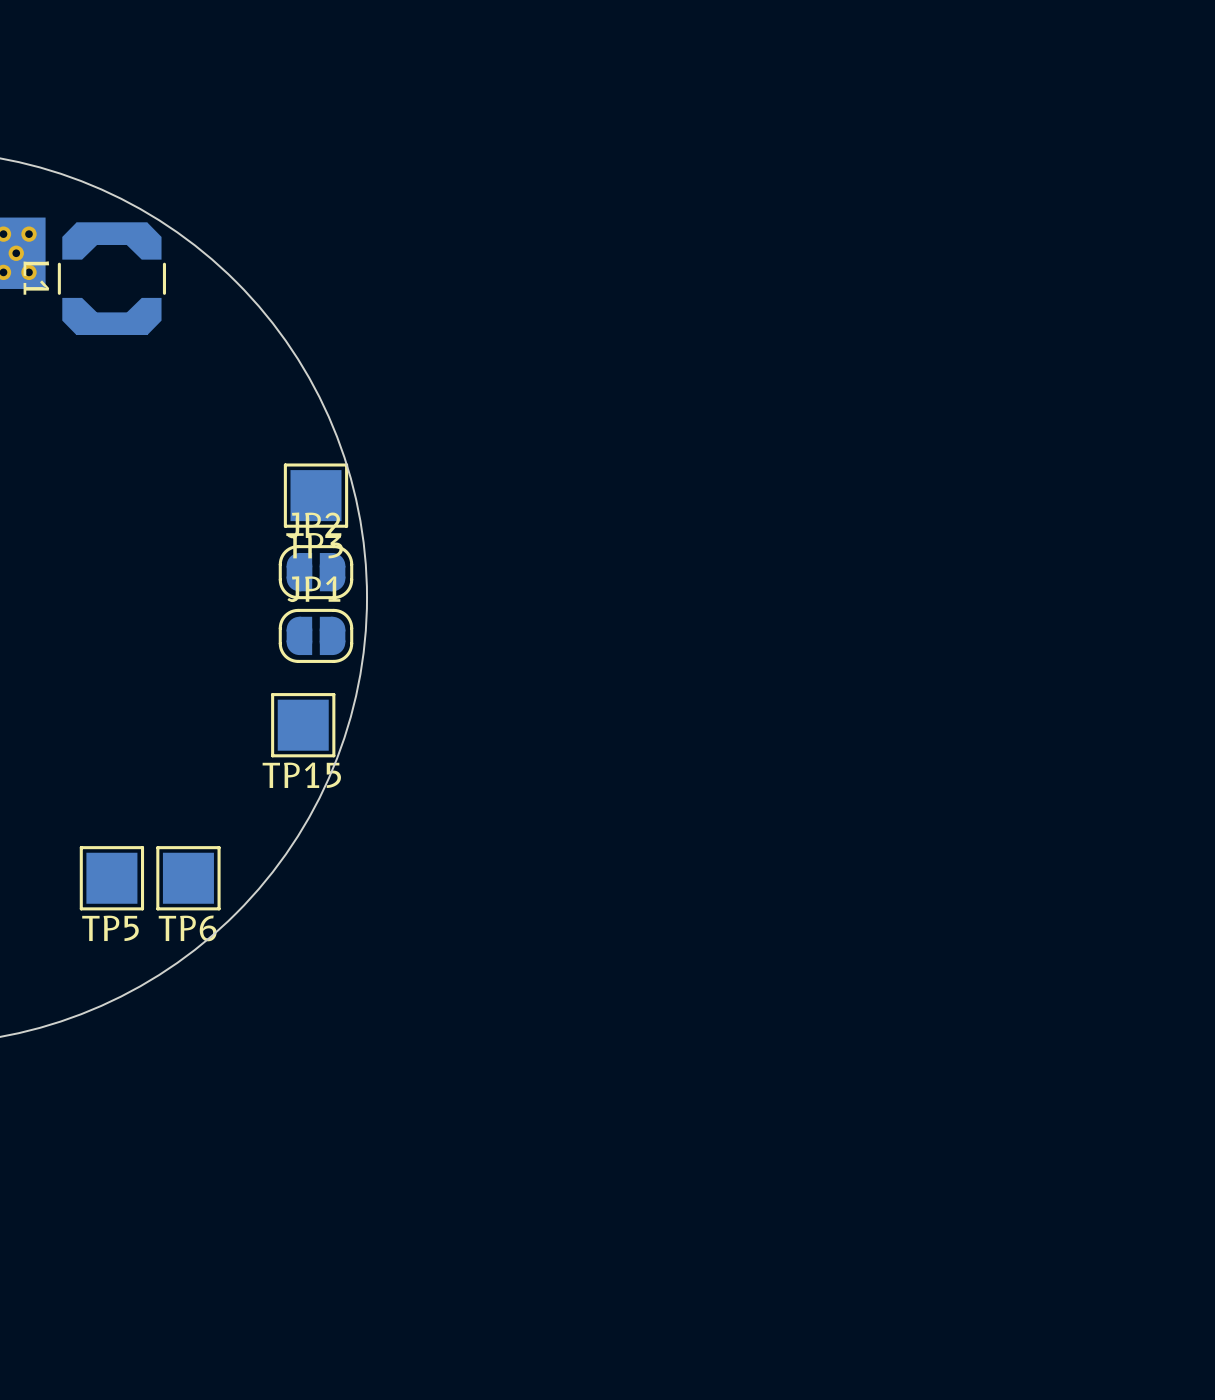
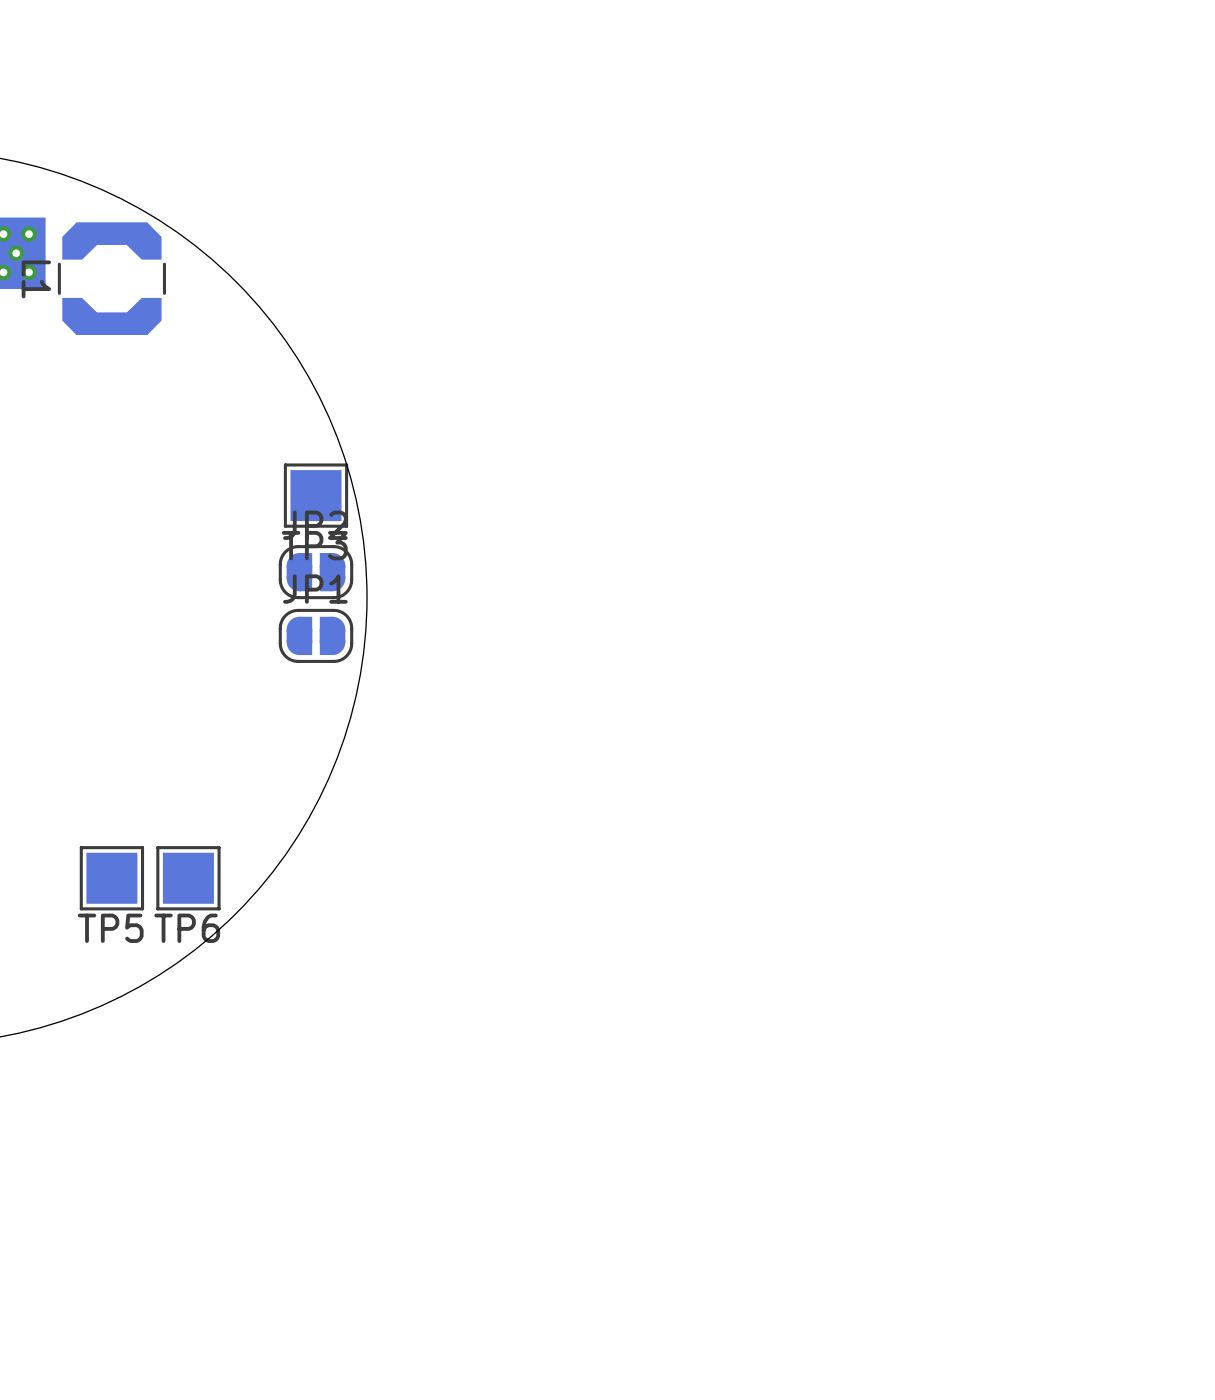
TP15: (303, 725) -> none

